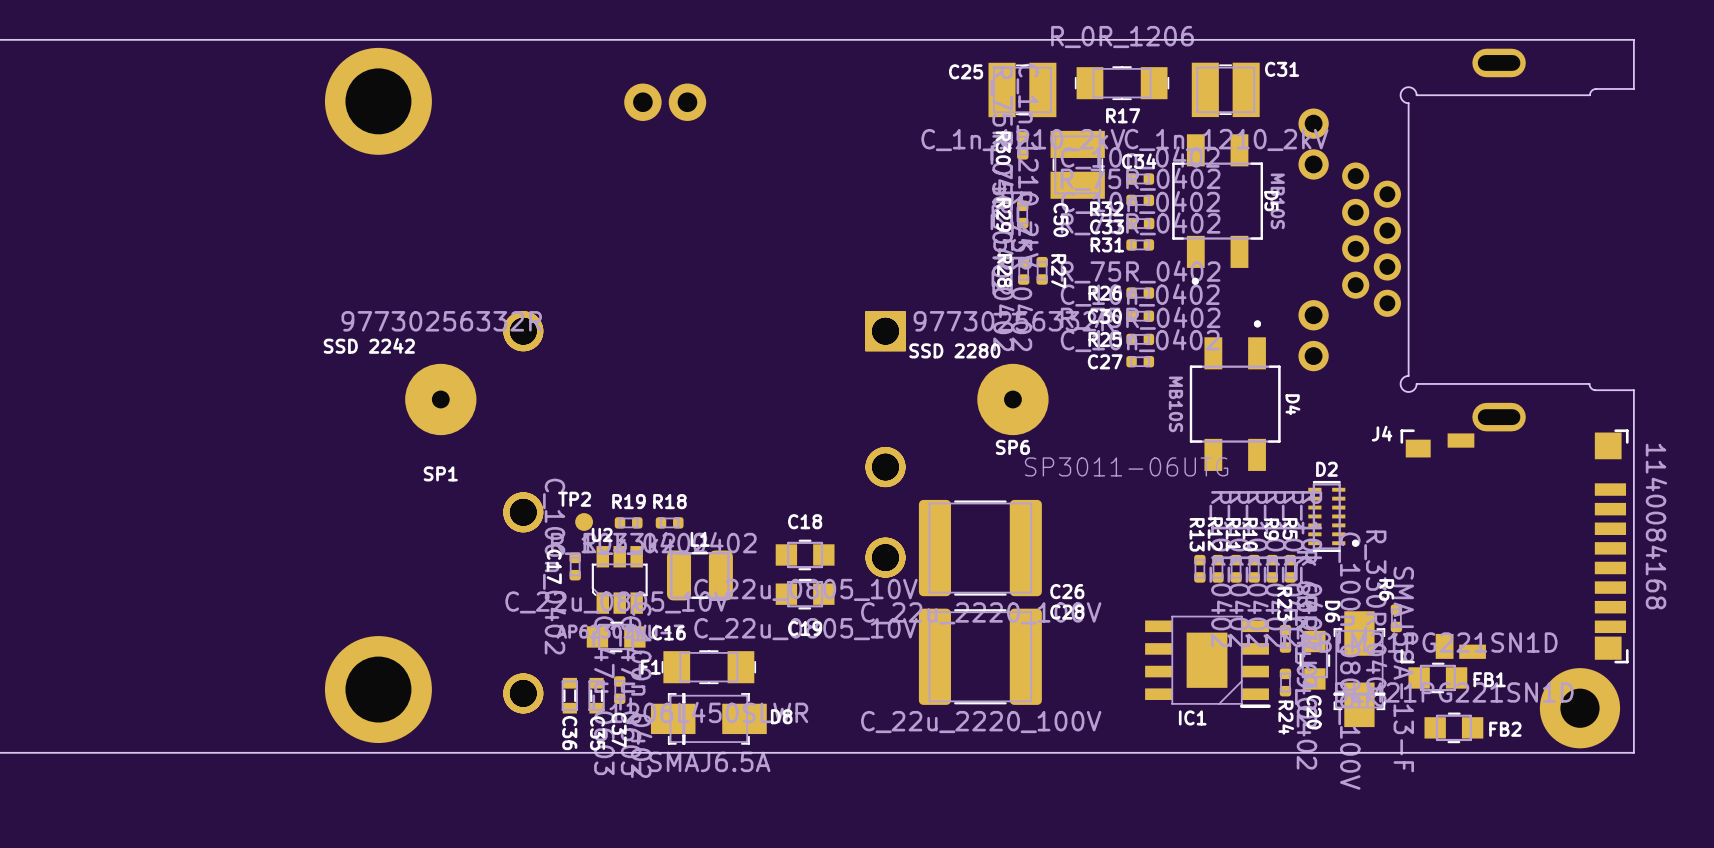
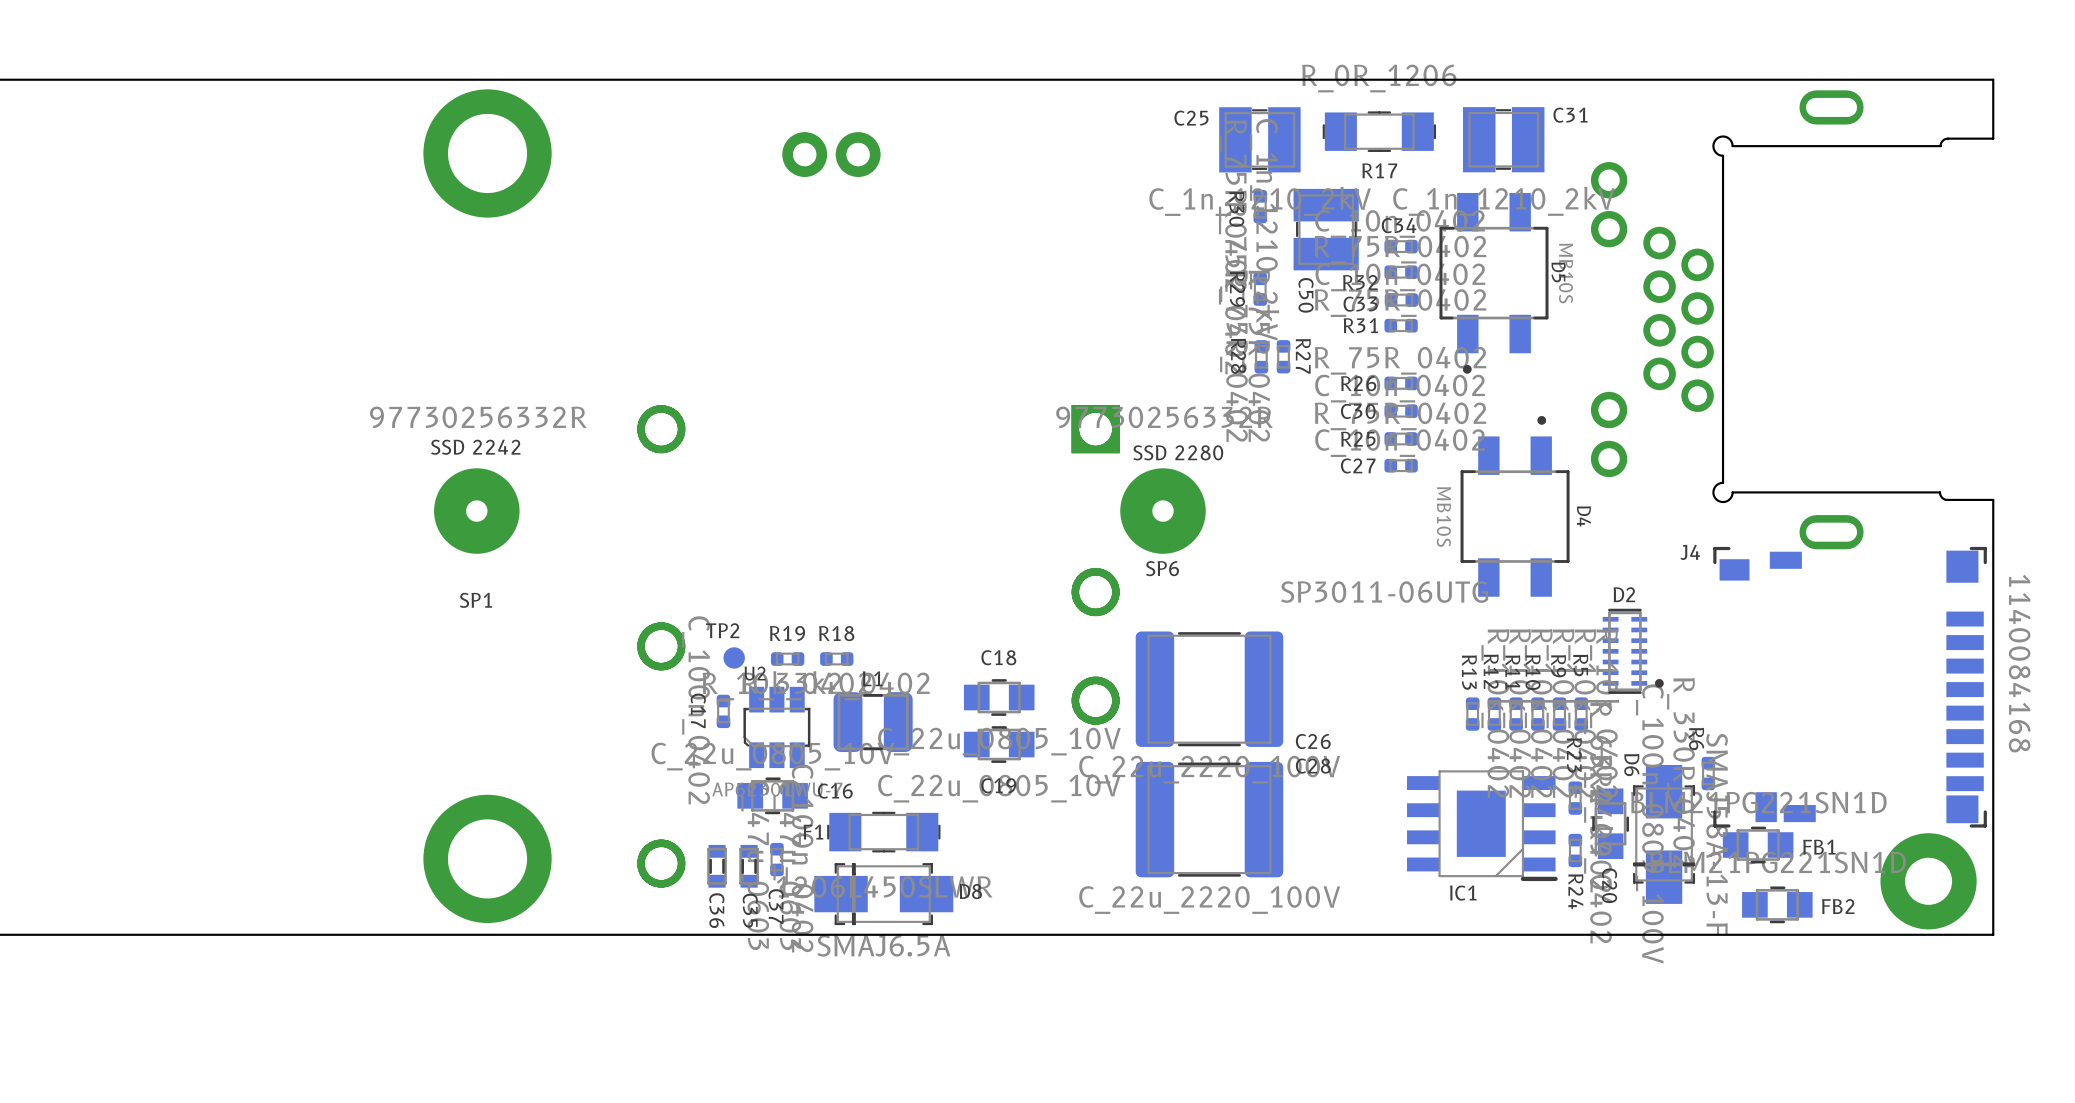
SP1 position: (440, 399) -> (476, 511)
SP6 position: (1012, 399) -> (1163, 511)

